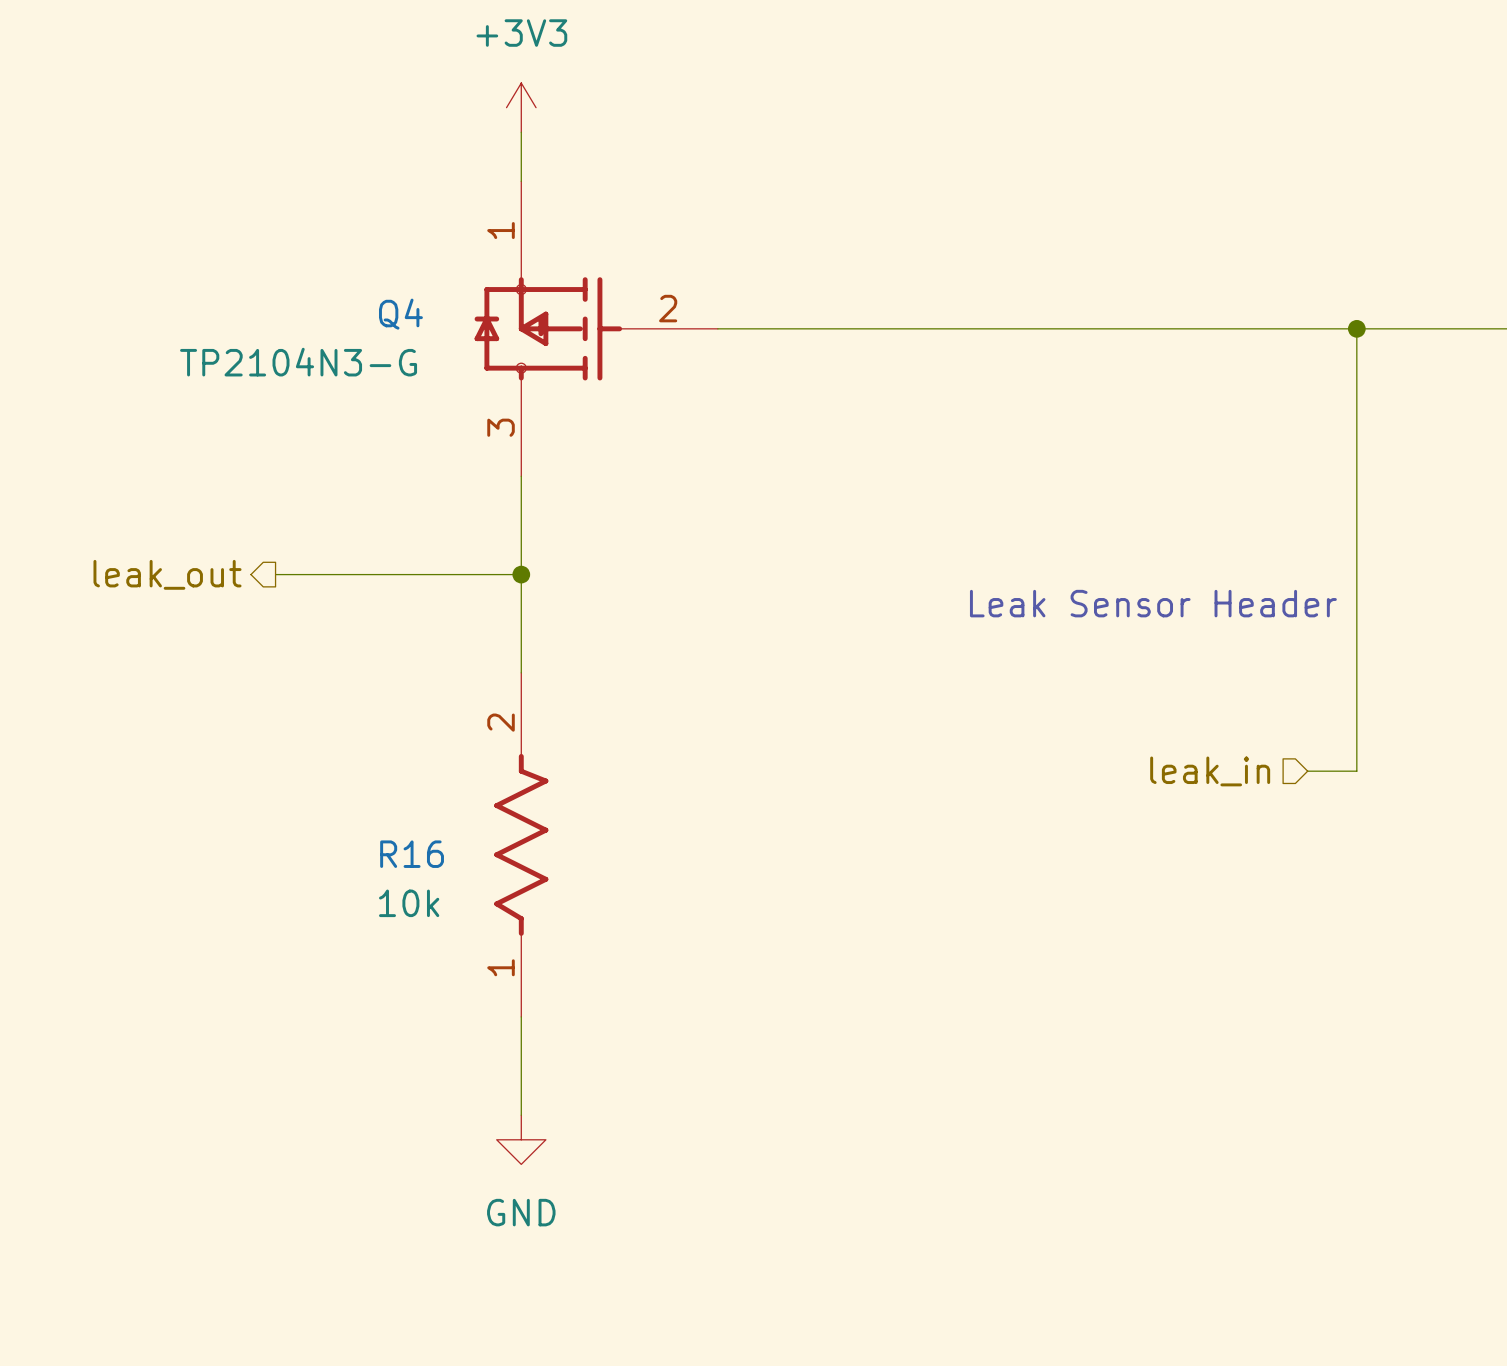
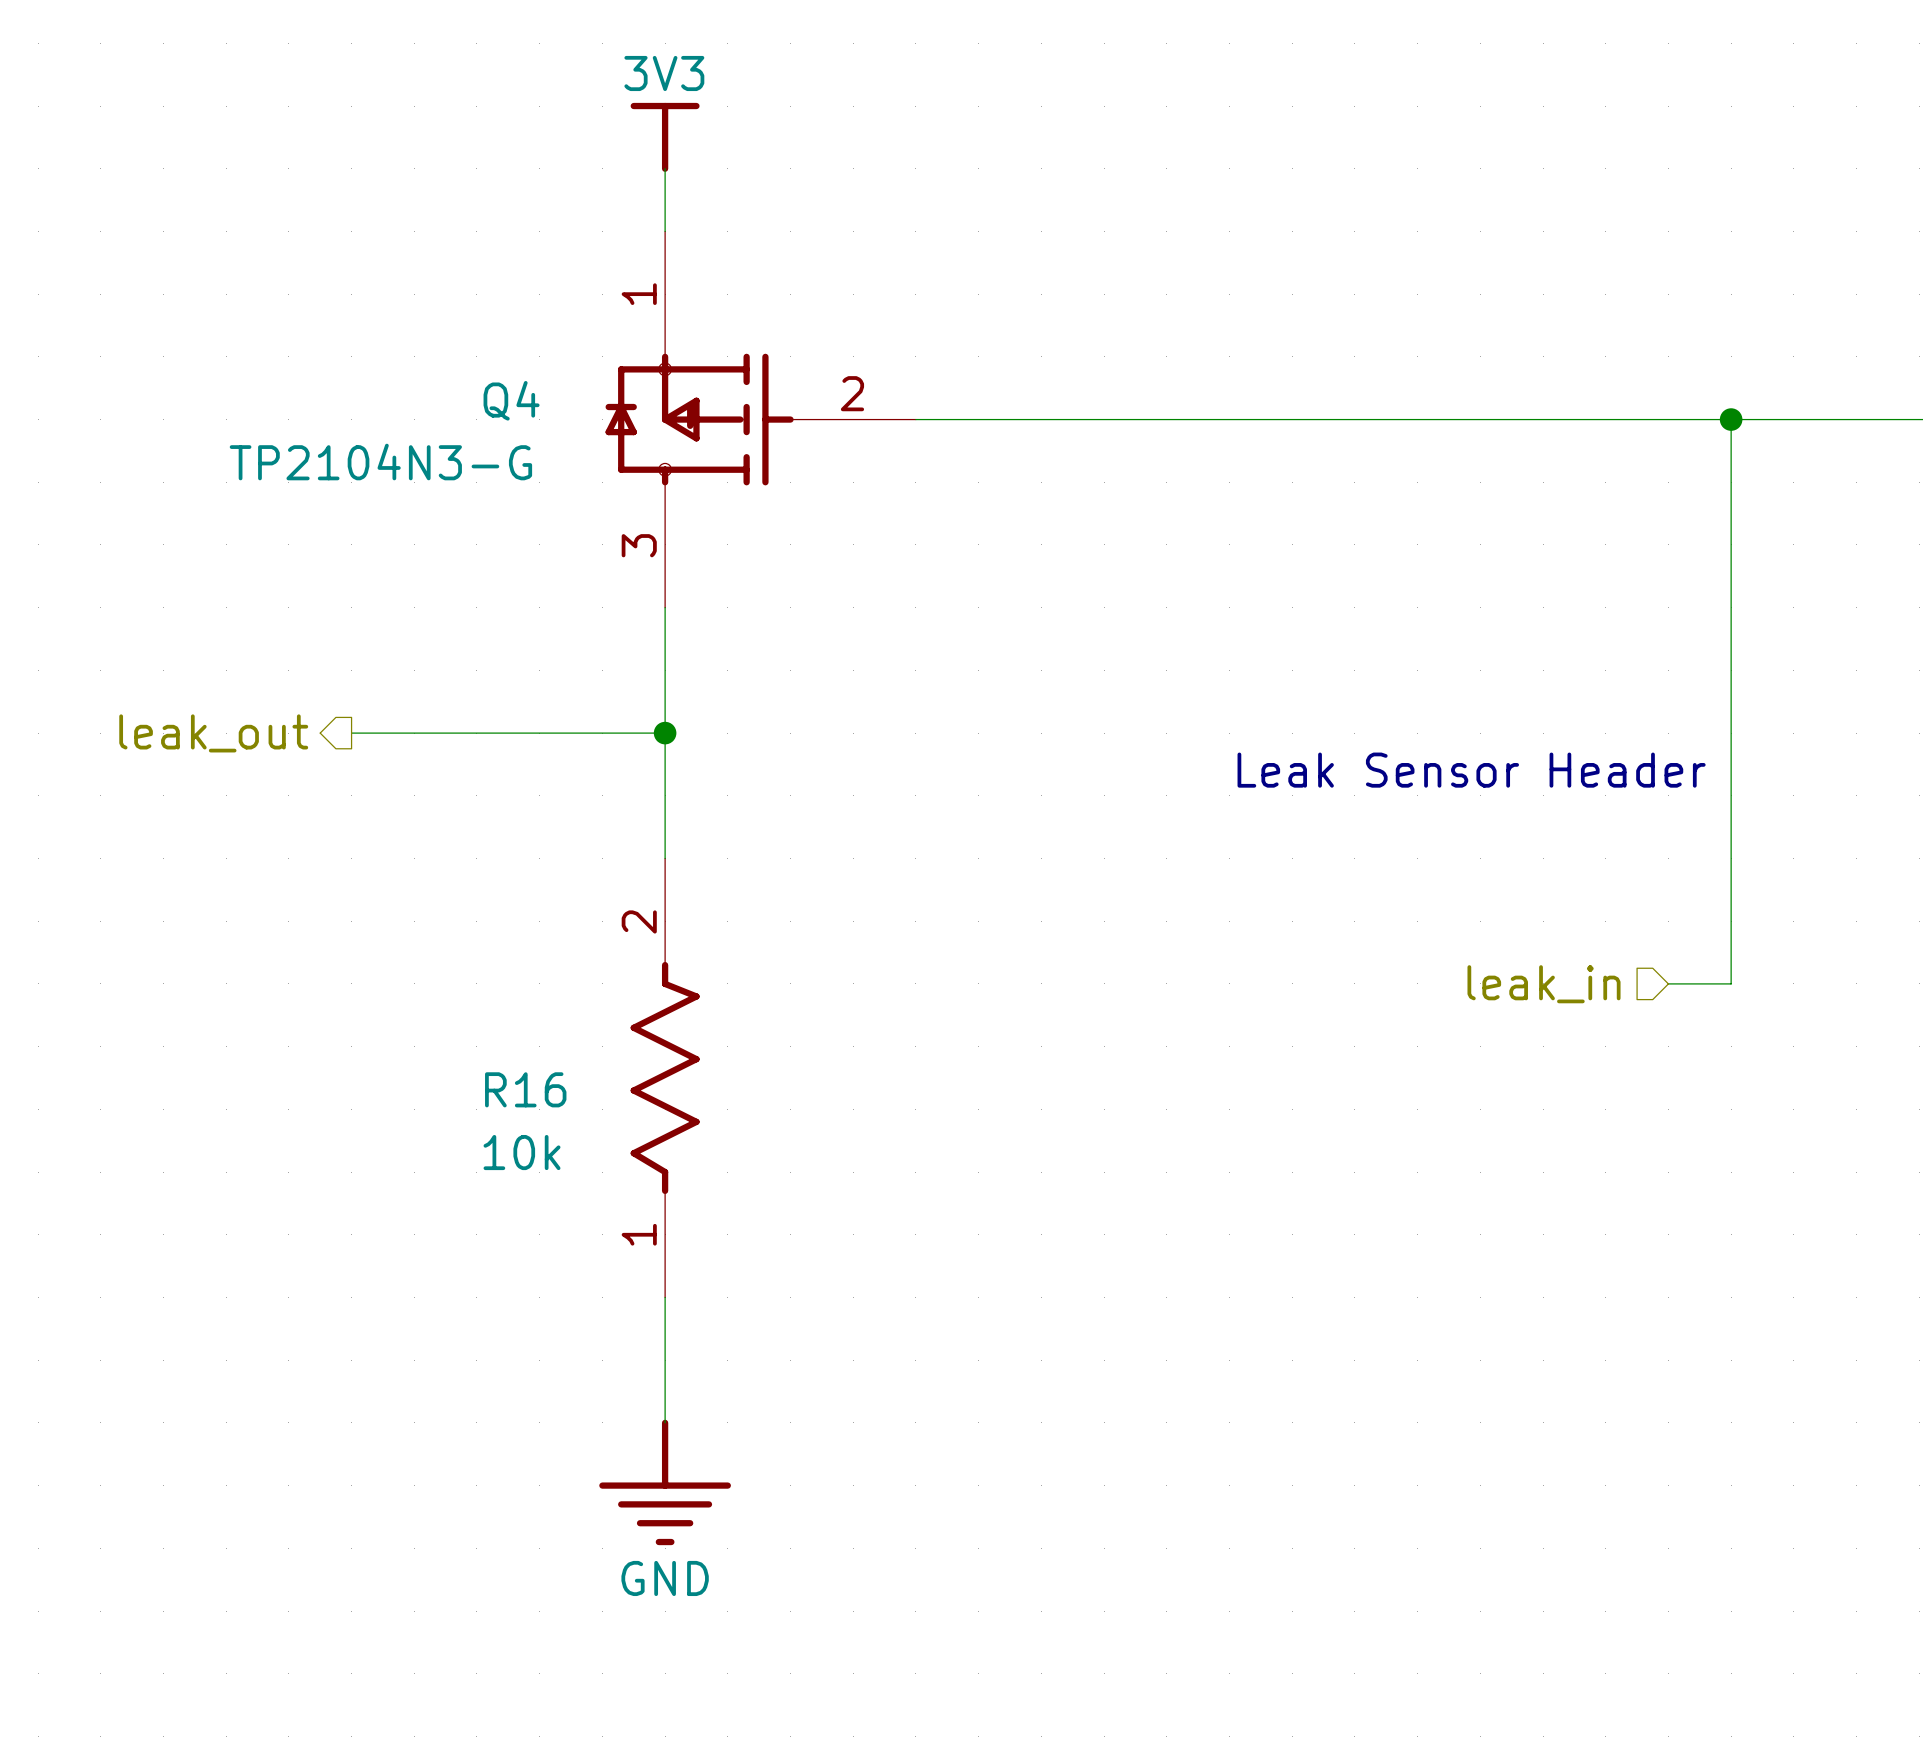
power symbol: +3V3 (521, 107) -> 3V3 (665, 137)
power symbol: GND (521, 1139) -> none
power symbol: none -> GND (665, 1482)

